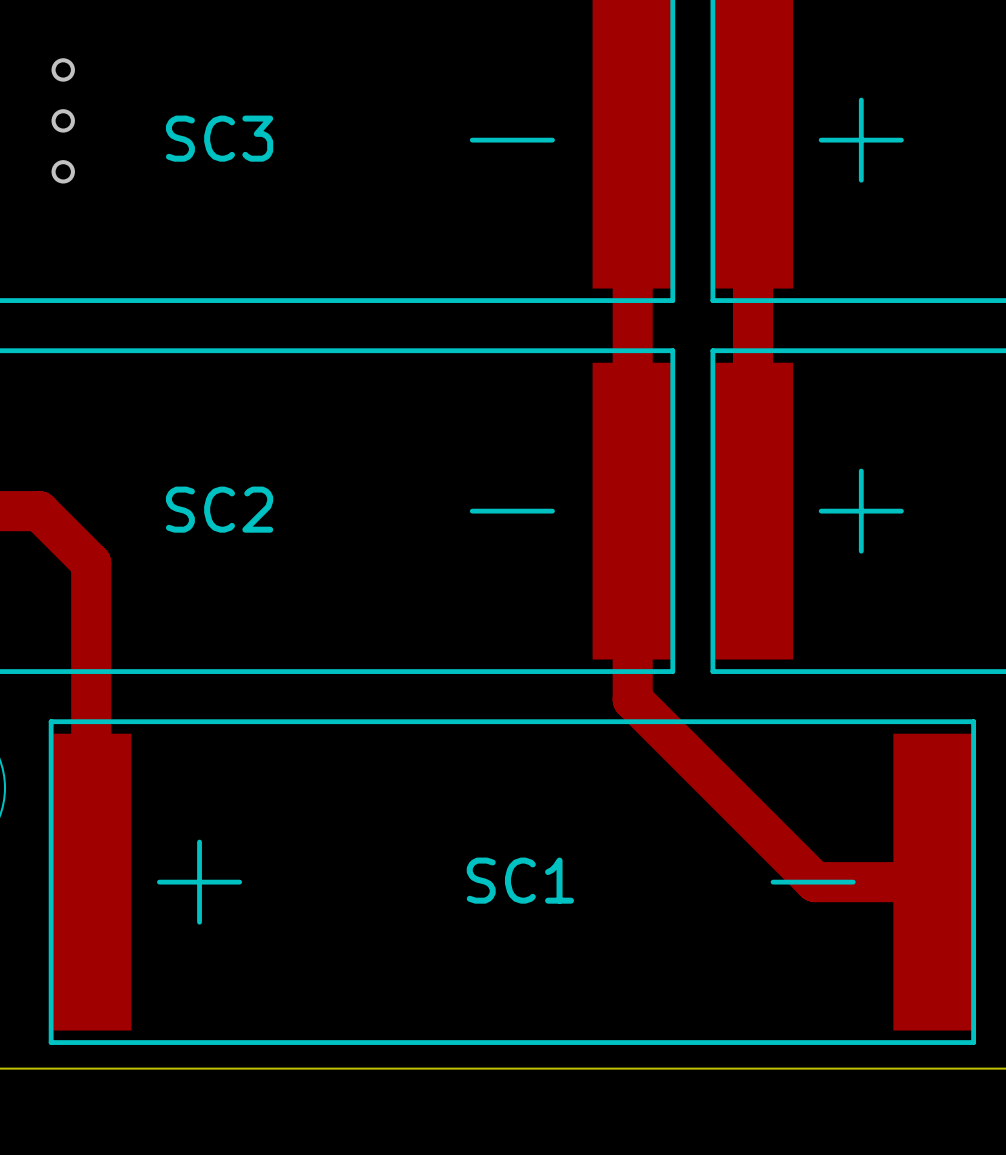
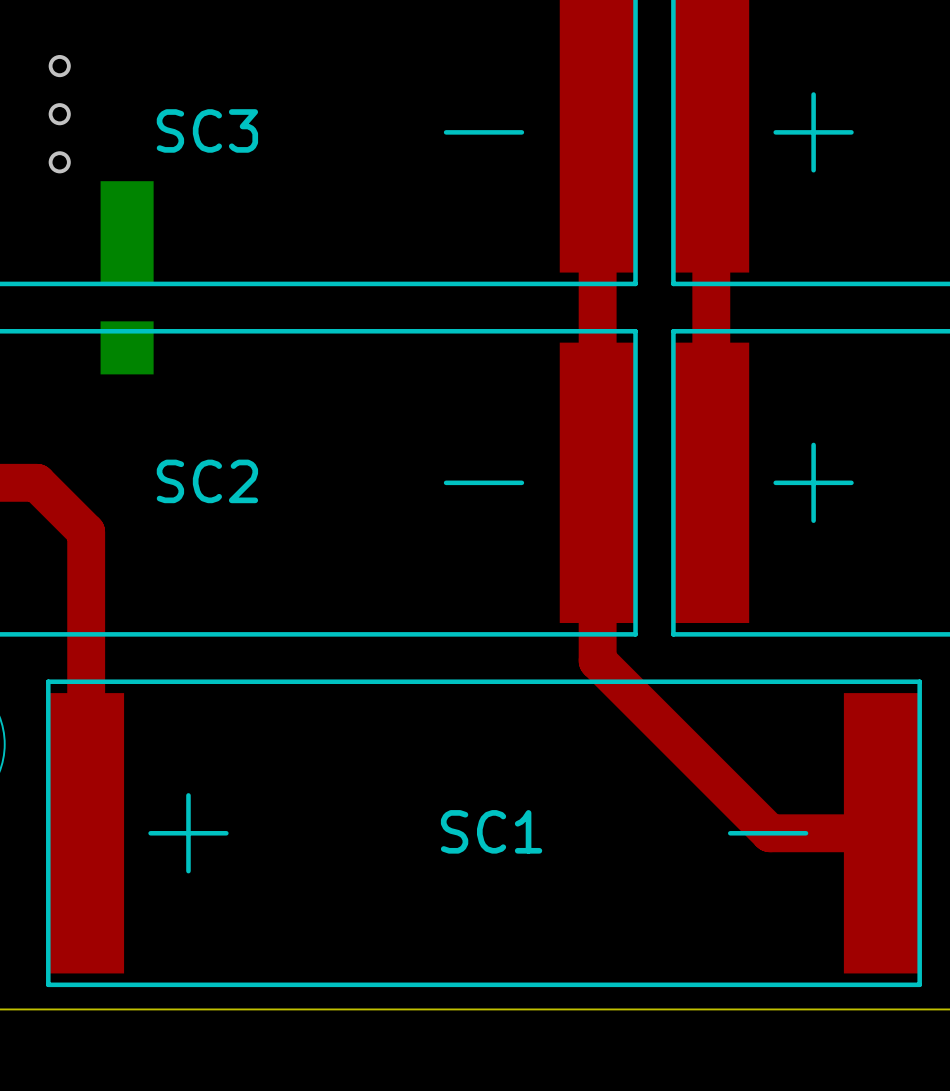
part: none -> (127, 277)

